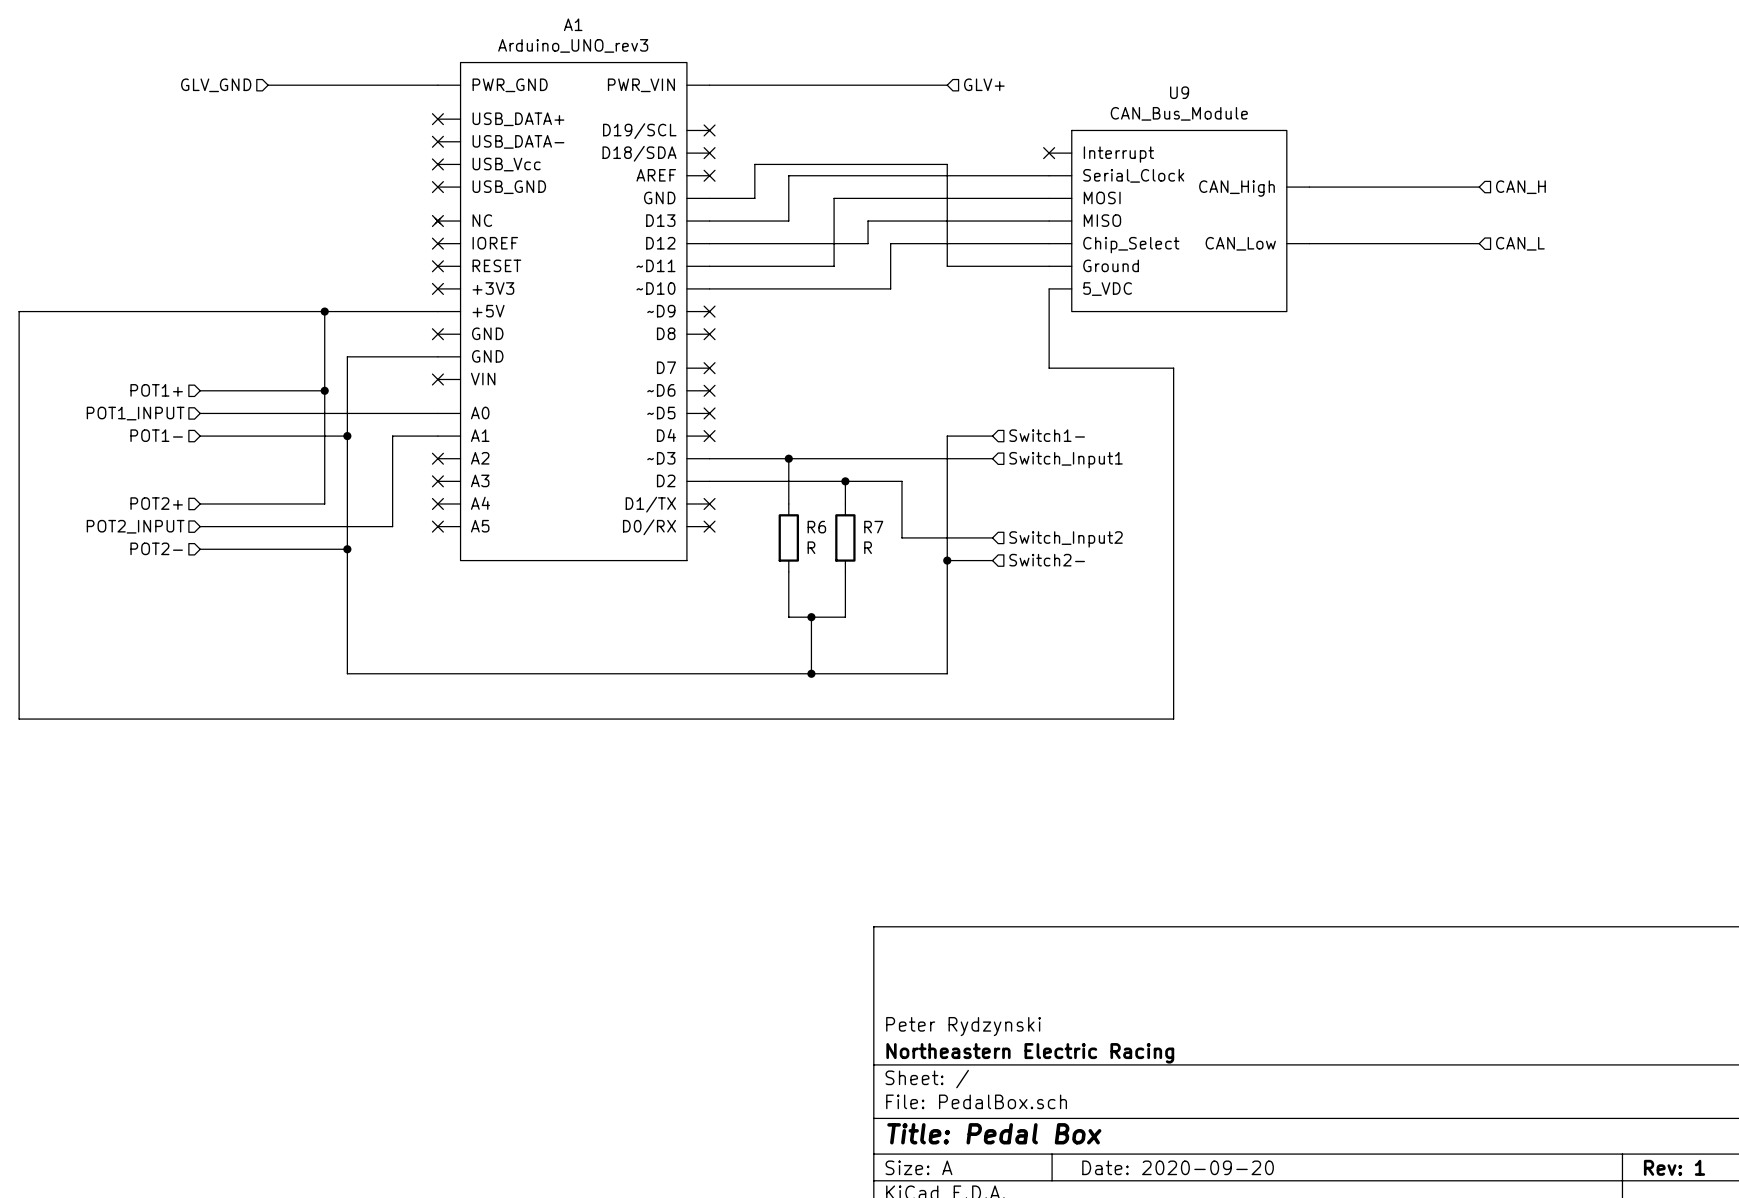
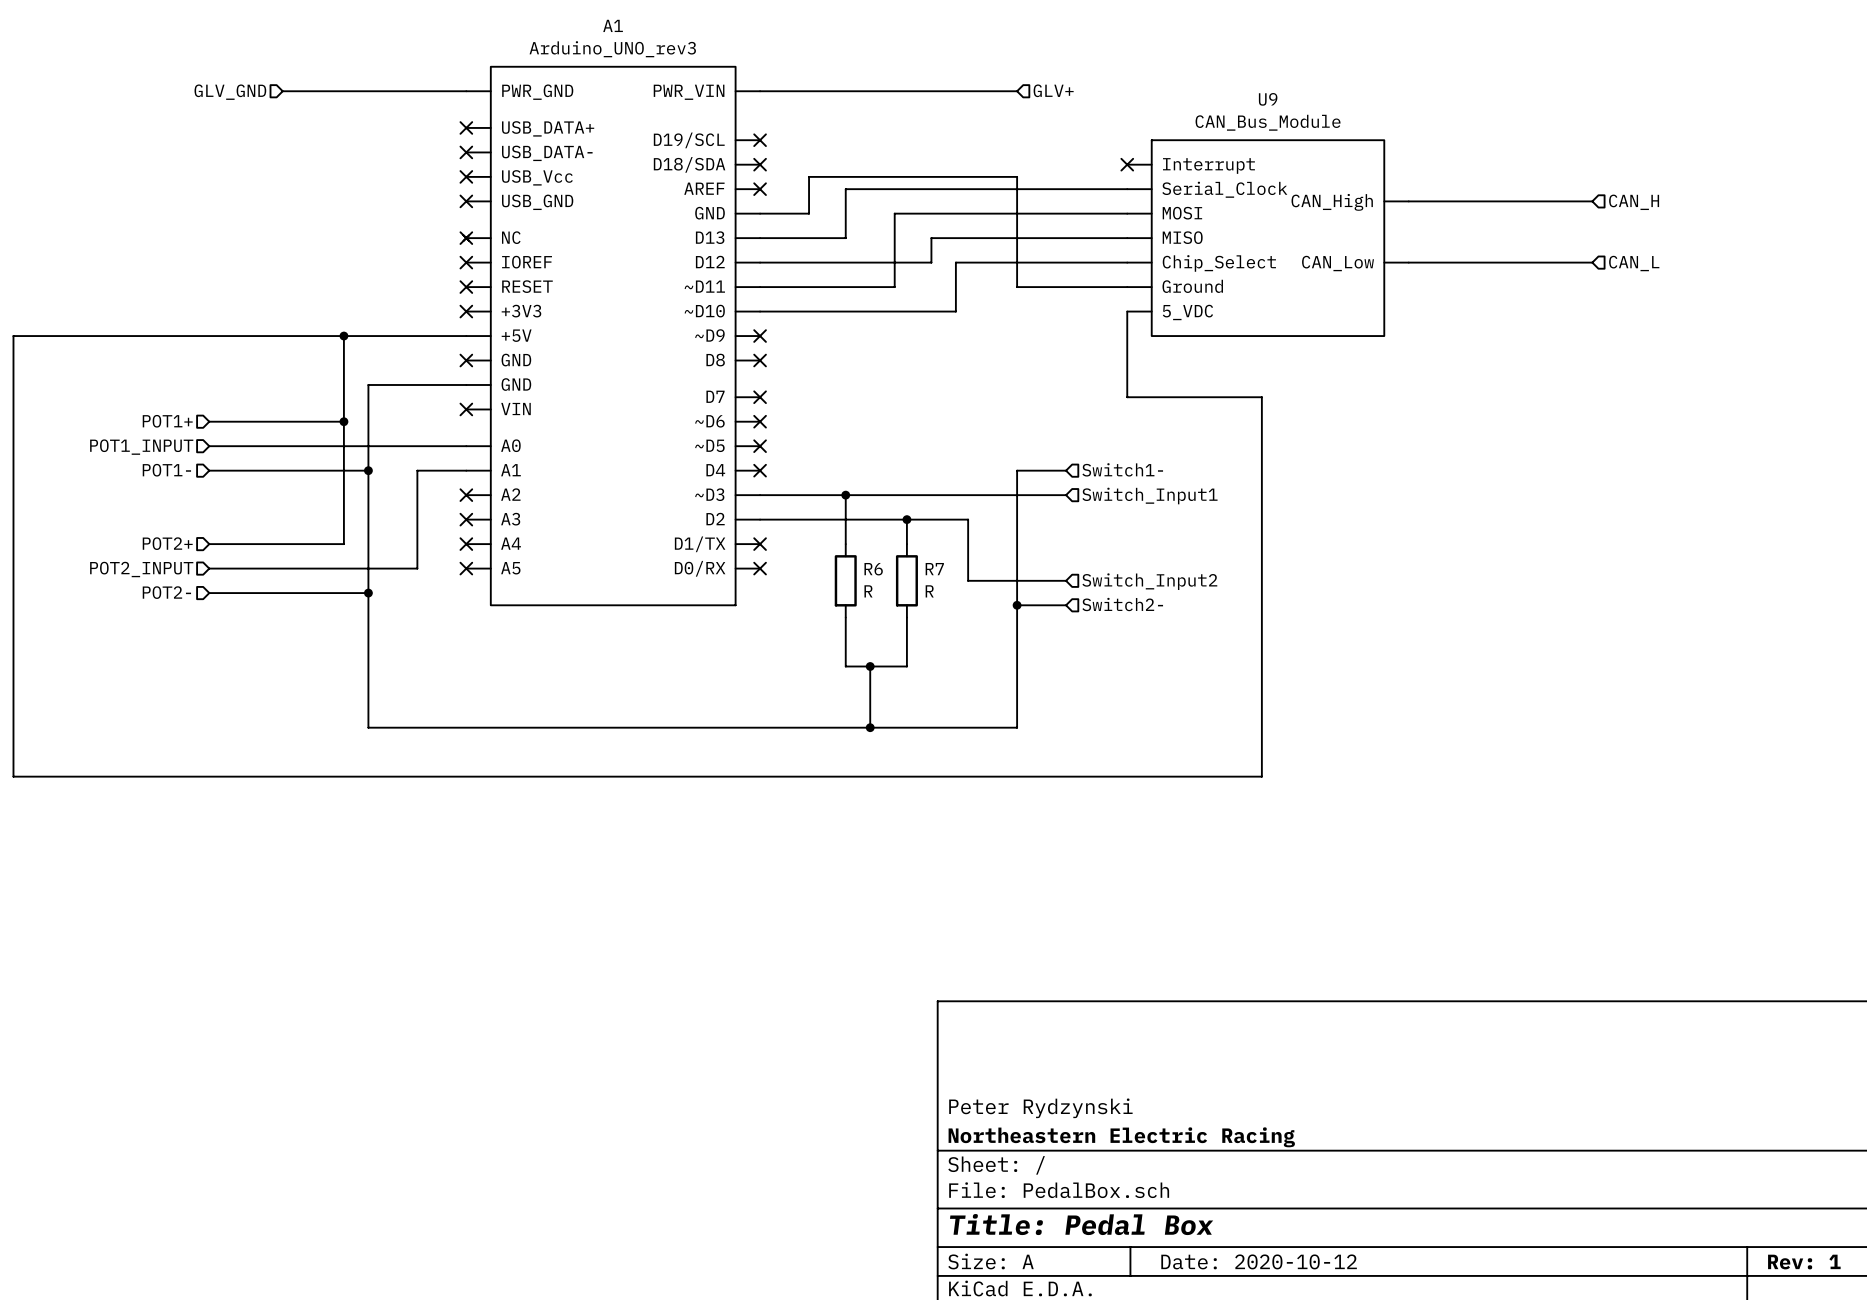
title block: Date: 2020-09-20 (1178, 1167) -> Date: 2020-10-12 (1259, 1261)

